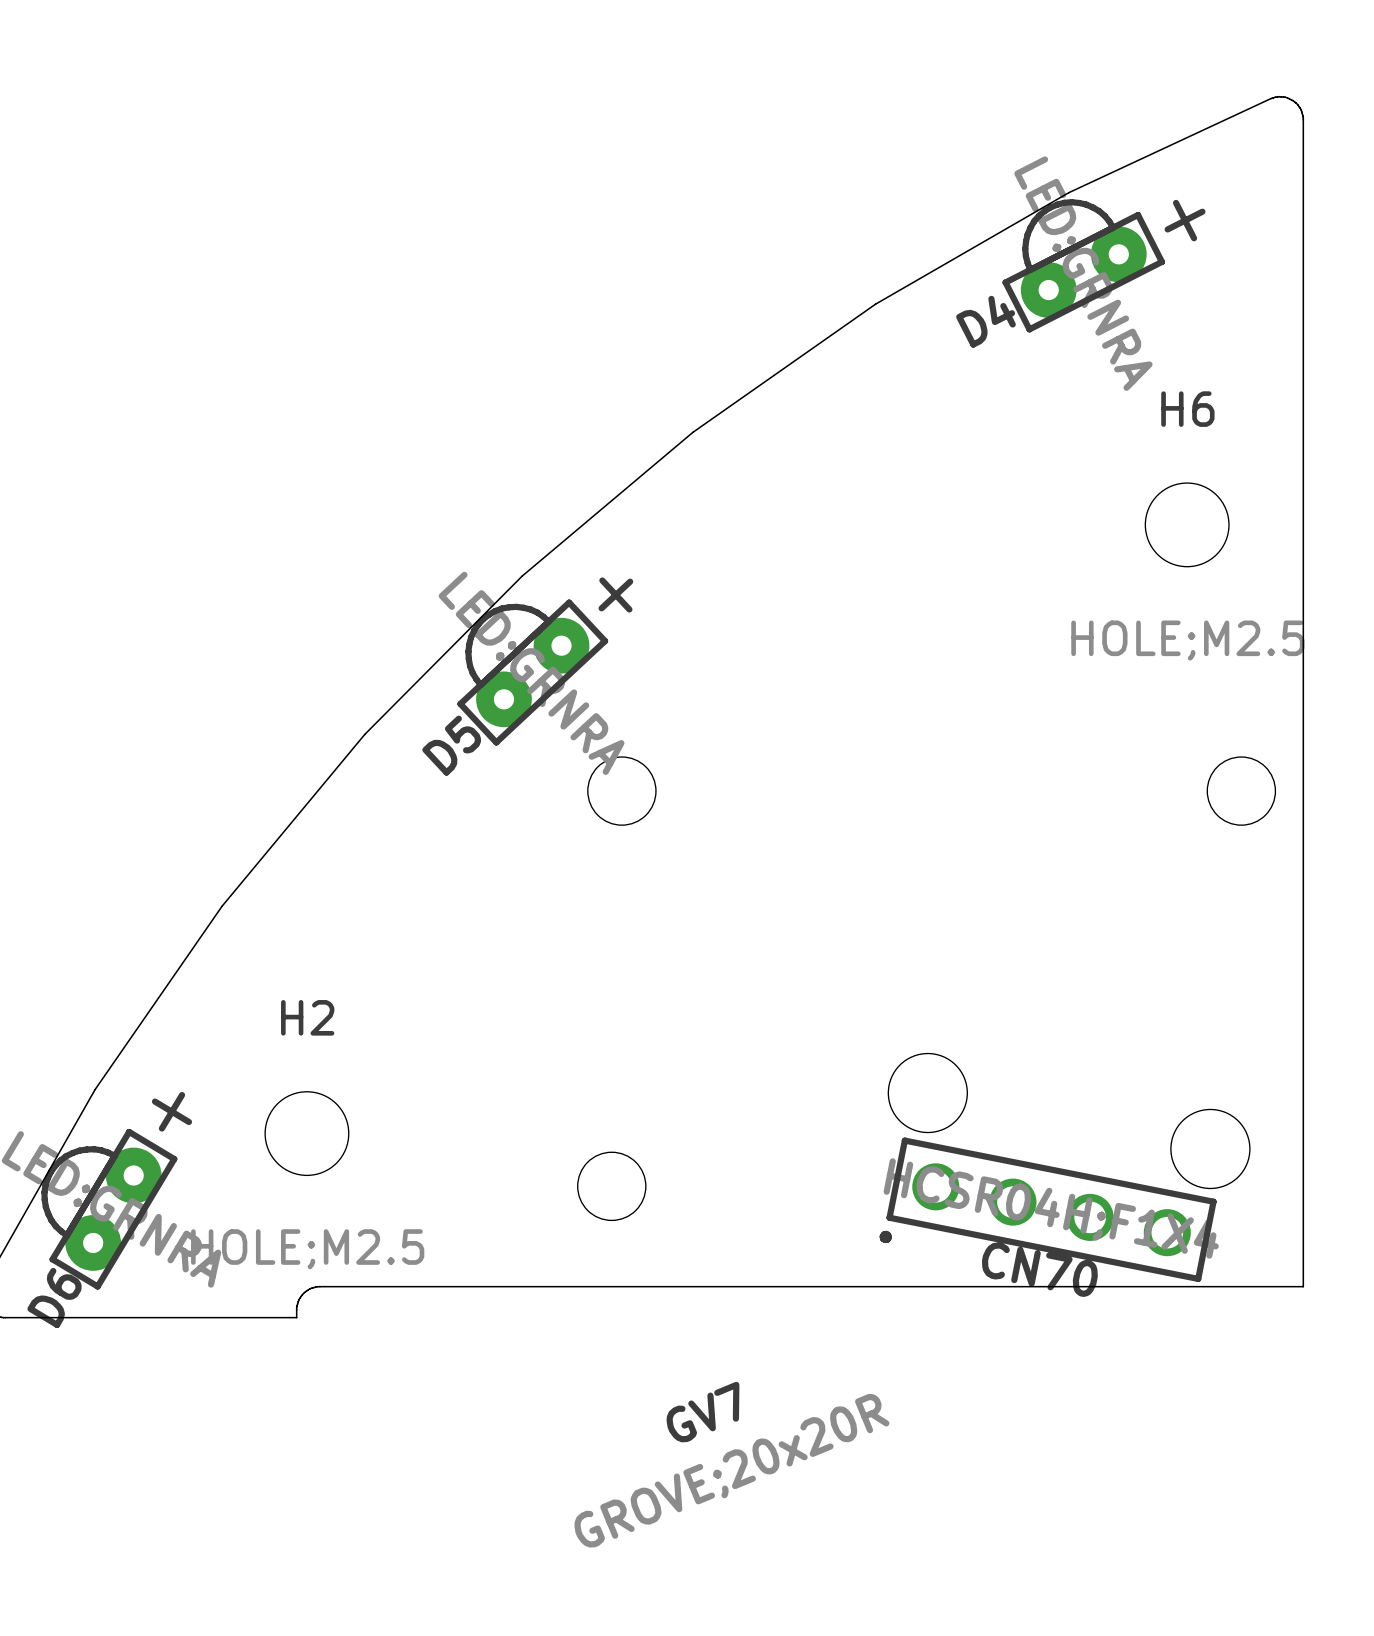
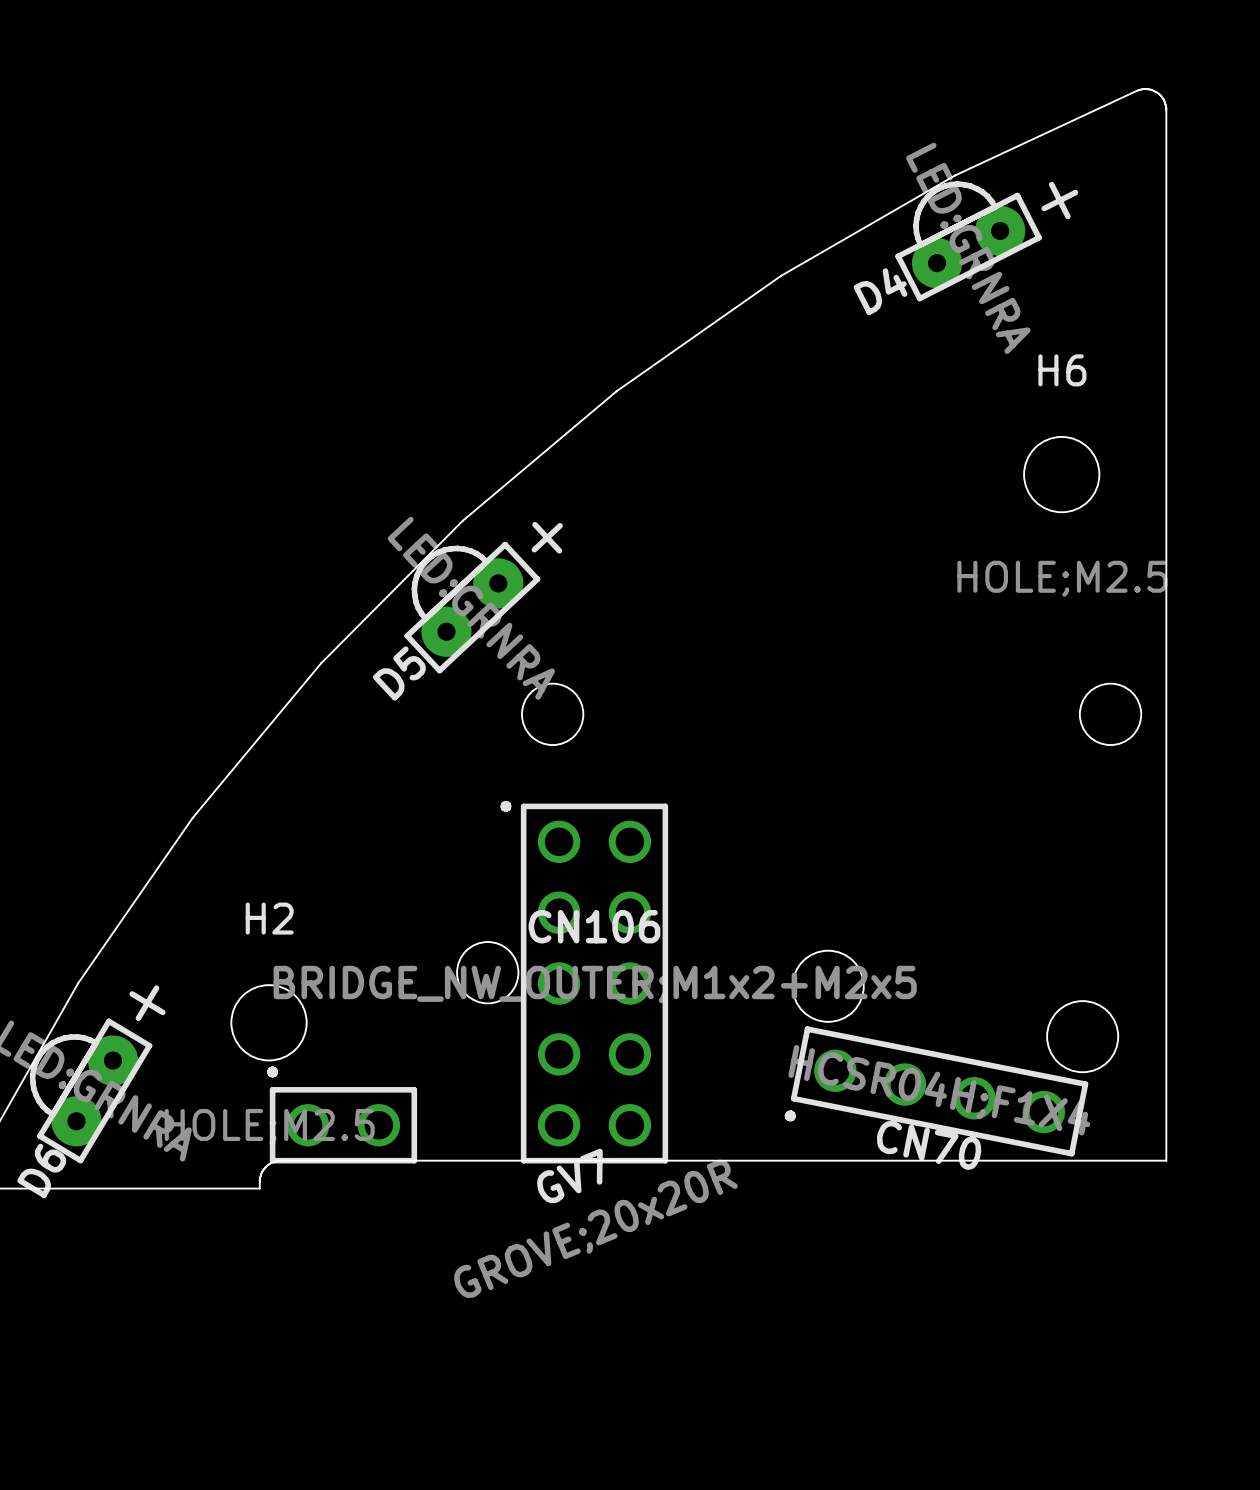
CN106: none -> BRIDGE_NW_OUTER;M1x2+M2x5 (467, 982)
GV7 position: (611, 1186) -> (487, 972)

